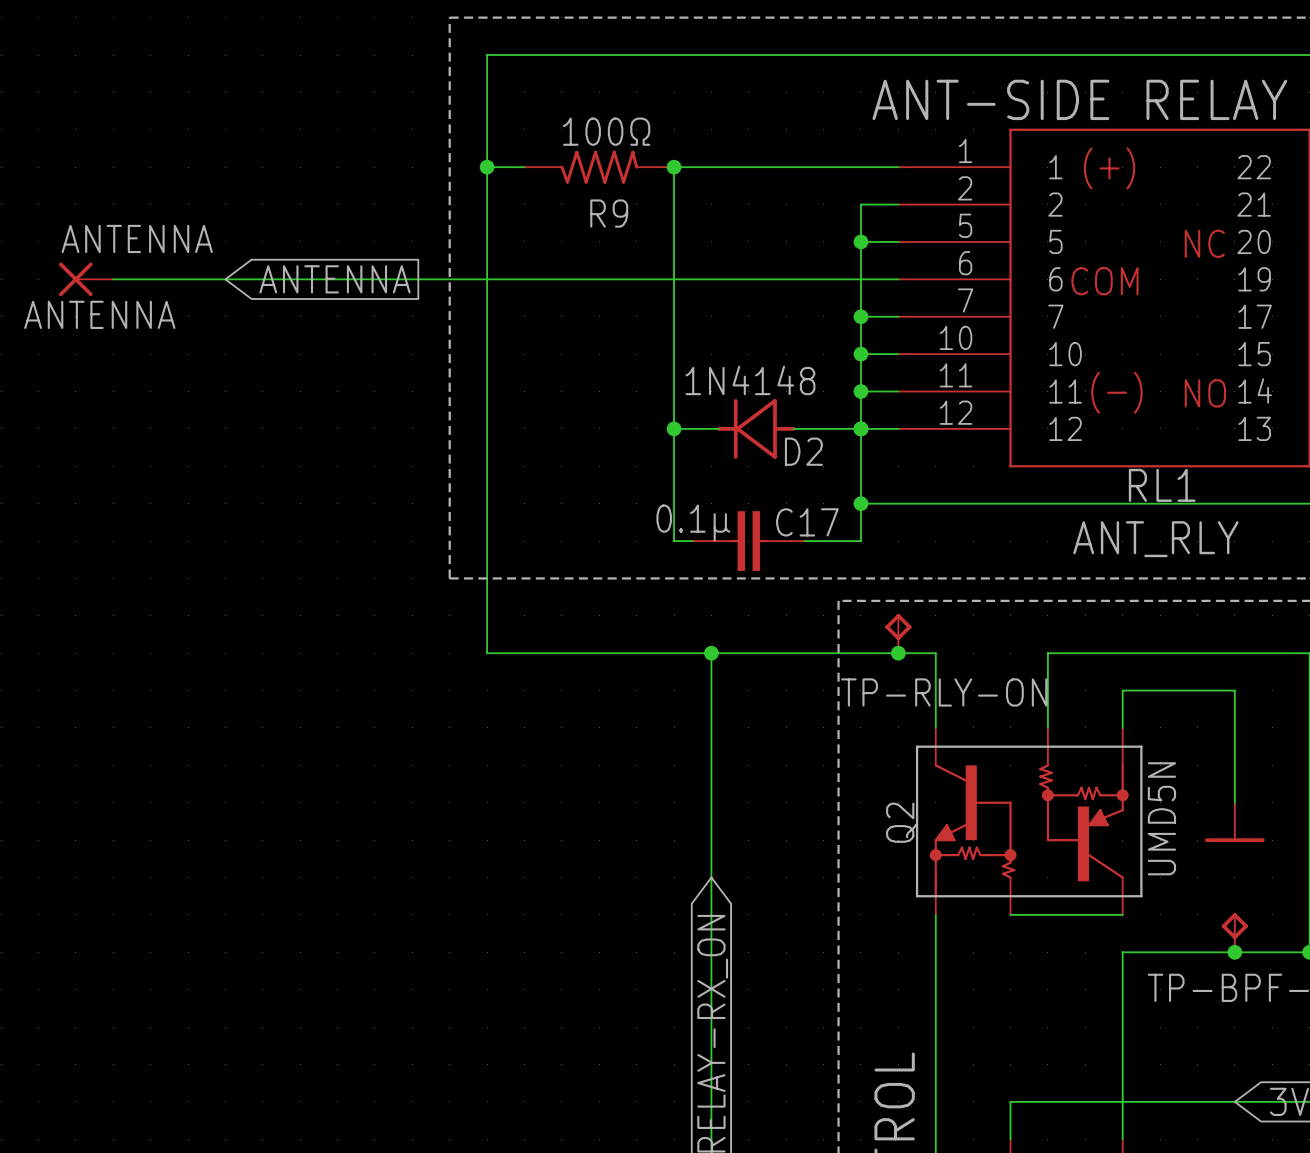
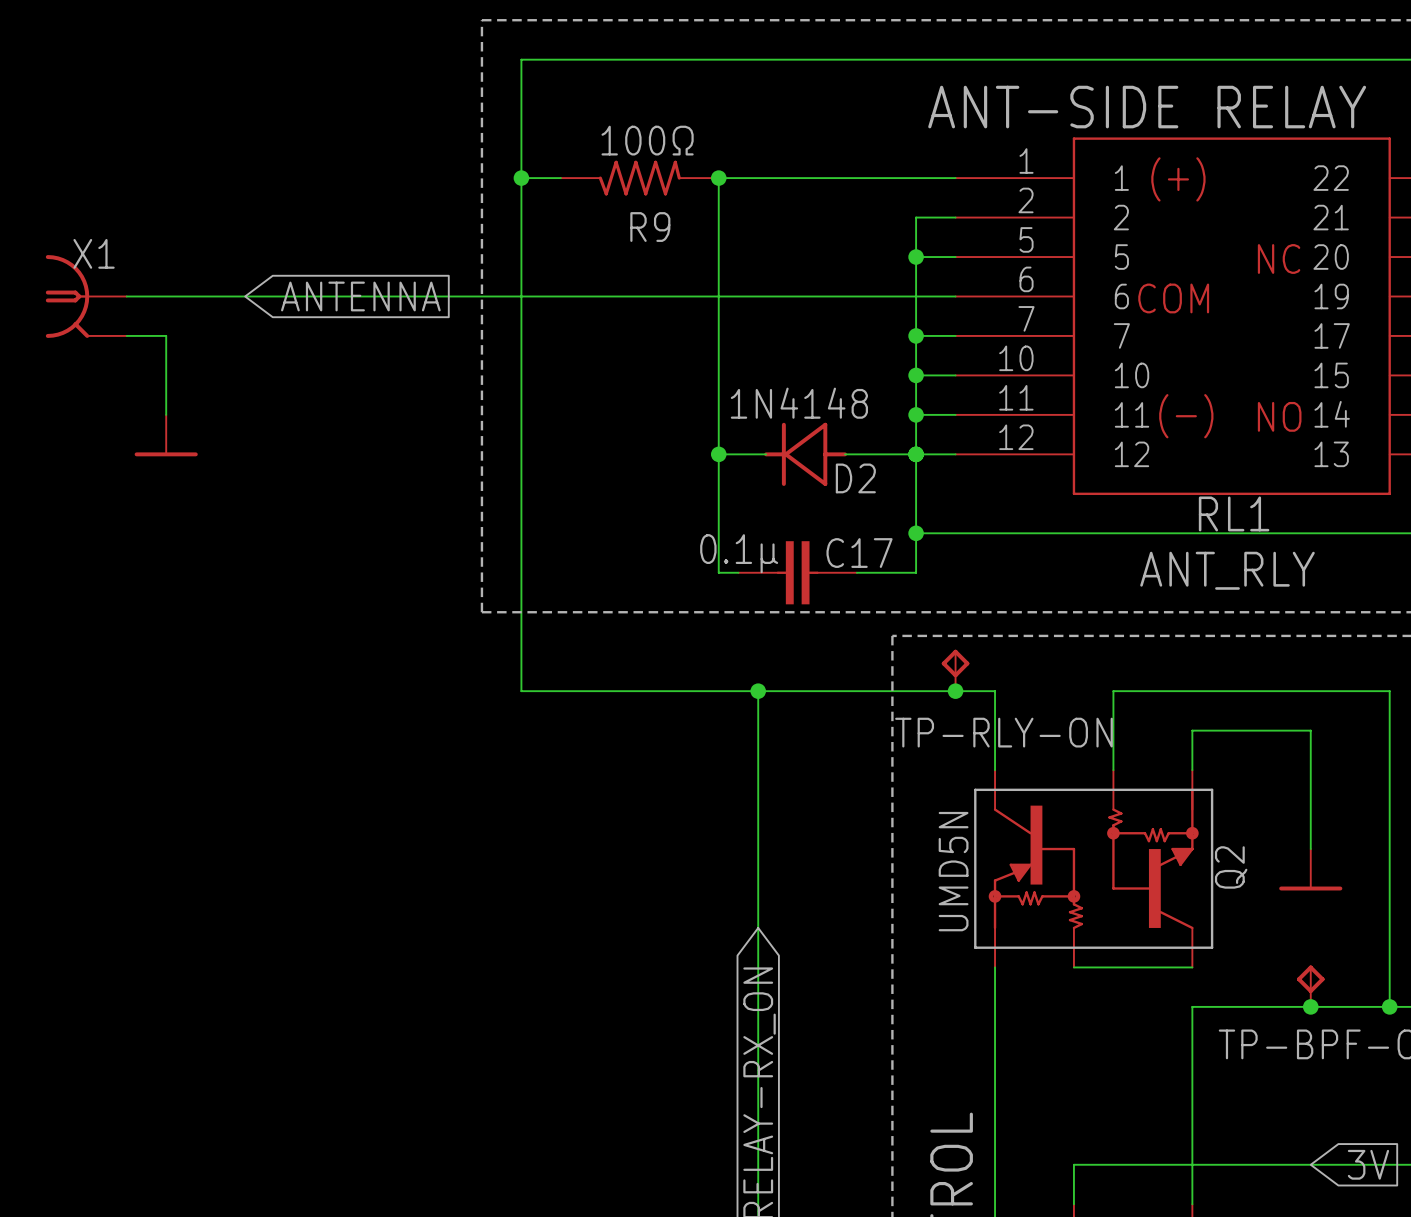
X1: none -> (86, 296)
ANTENNA: ANTENNA (86, 279) -> none
wire: none -> (126, 335) (166, 335) (166, 414)
power symbol: none -> (166, 435)
Q2 rotation: 0° (1029, 821) -> 180° (1093, 868)

